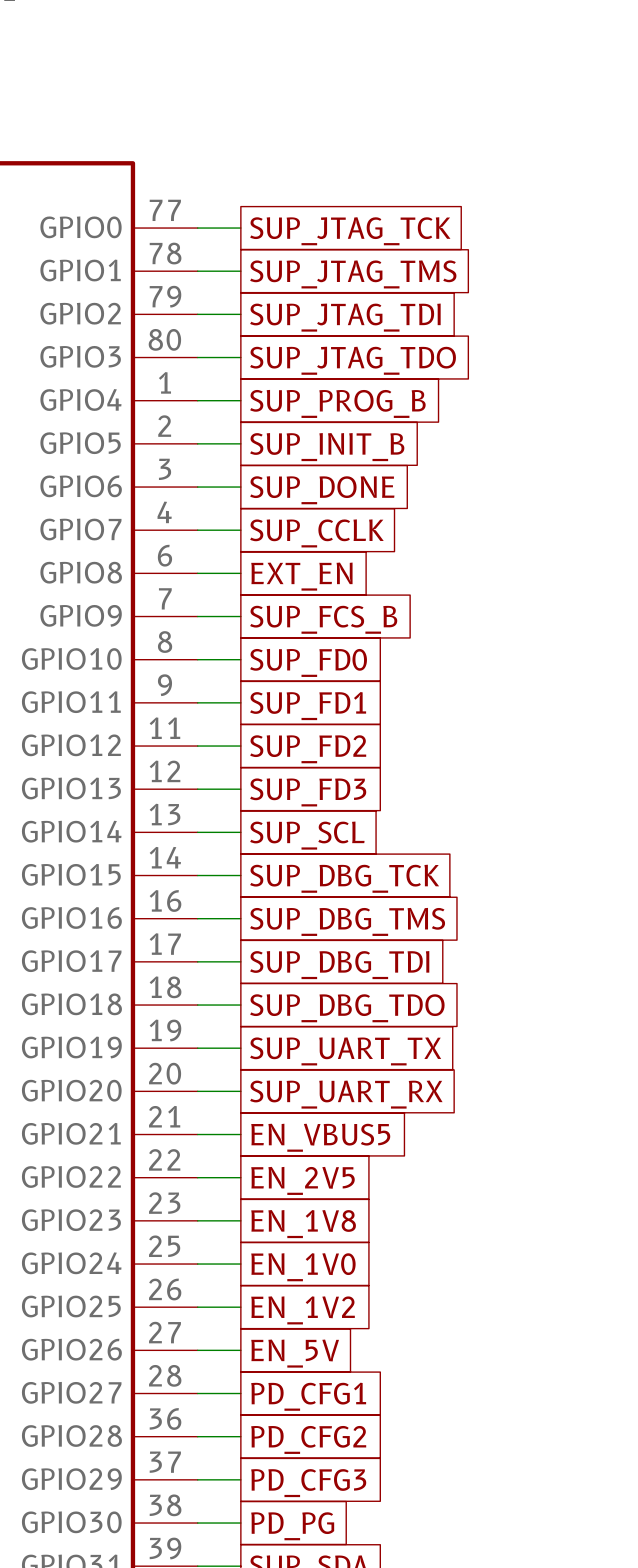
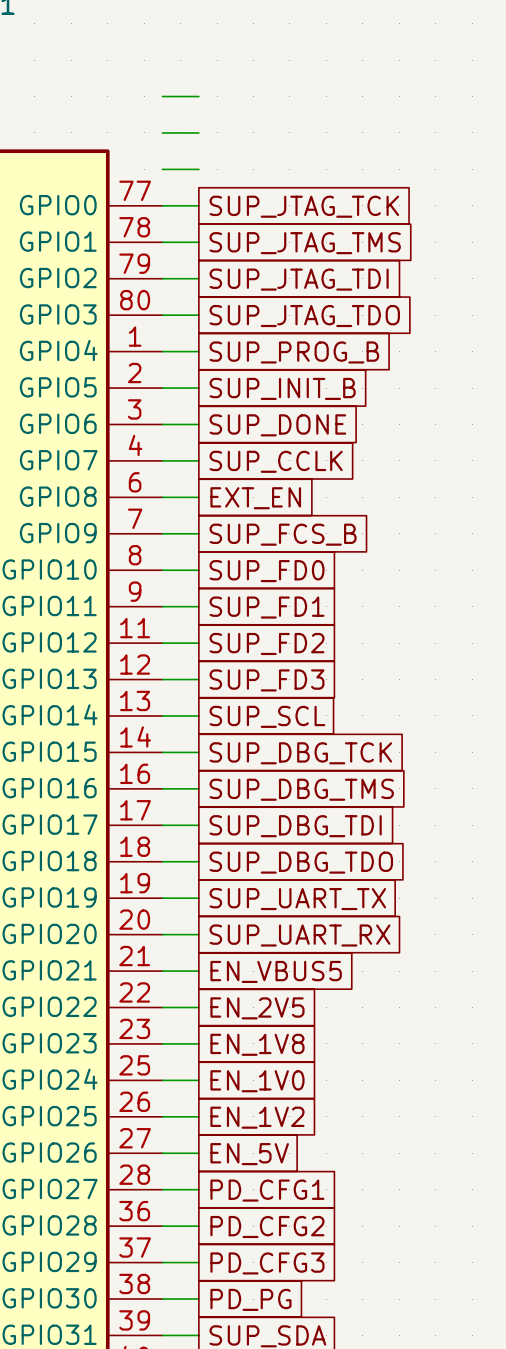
wire: none -> (162, 96) (198, 96)
wire: none -> (162, 132) (198, 132)
wire: none -> (162, 169) (198, 169)

